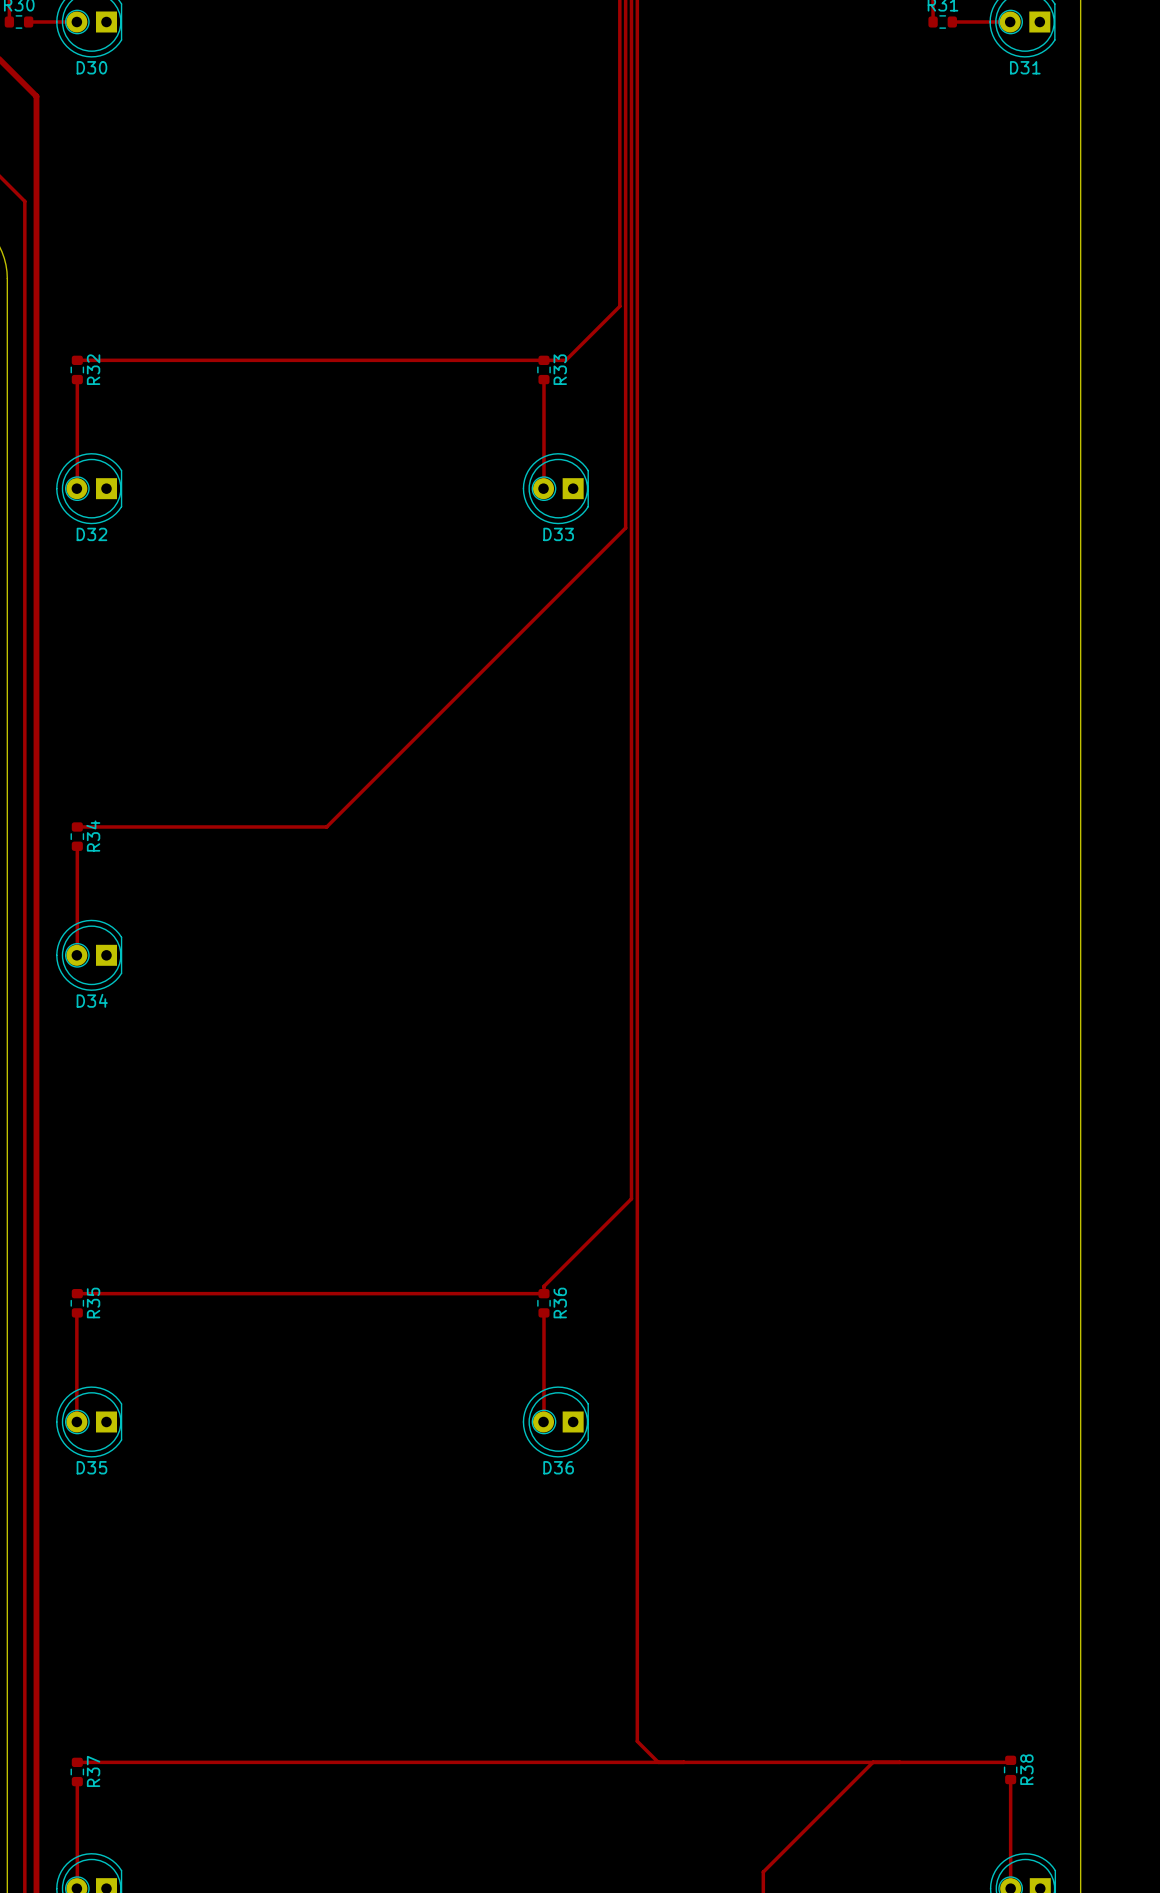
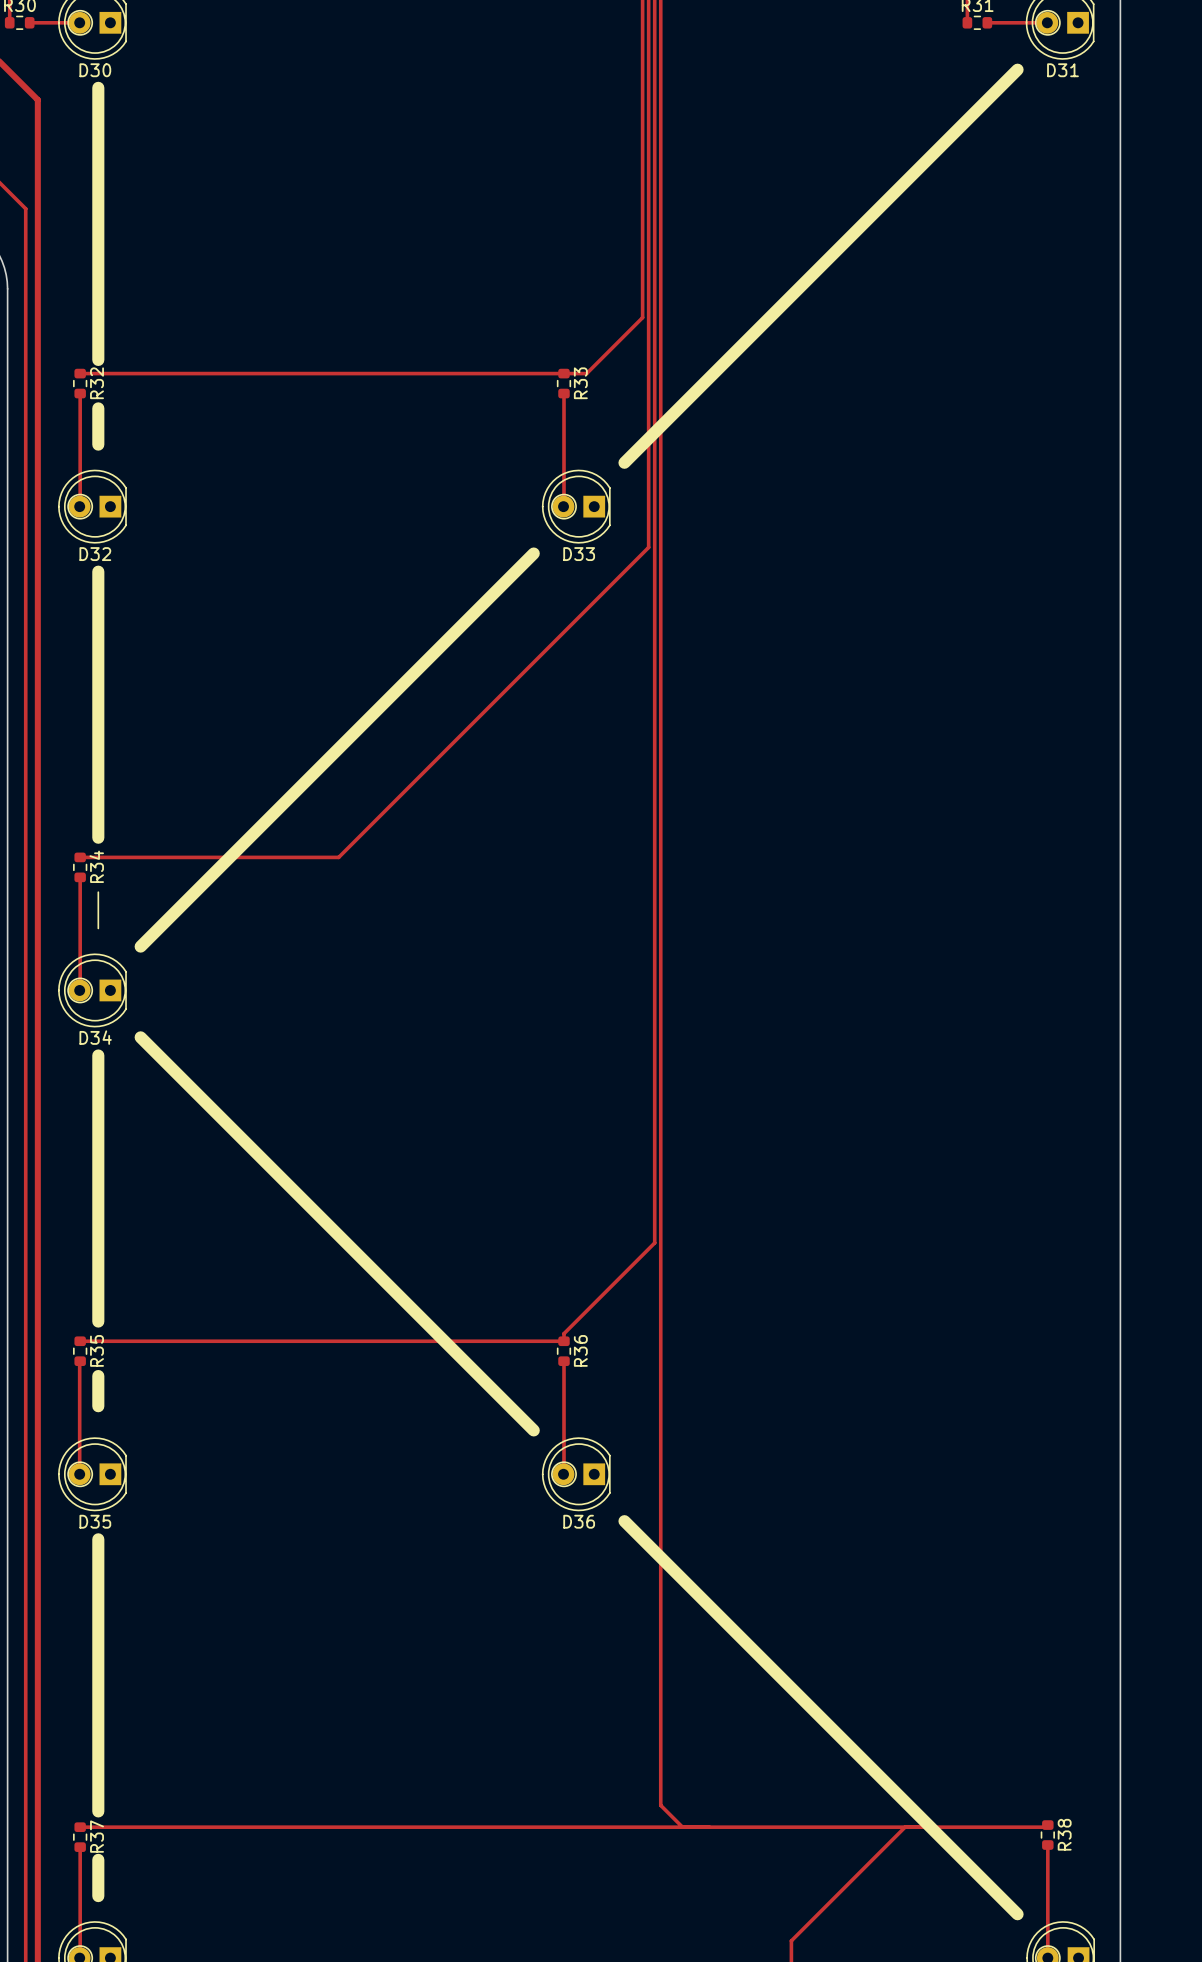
line: none -> (1017, 69) (624, 462)
line: none -> (98, 87) (98, 359)
line: none -> (98, 408) (98, 444)
line: none -> (533, 553) (140, 946)
line: none -> (98, 571) (98, 837)
line: none -> (98, 892) (98, 928)
line: none -> (140, 1037) (533, 1430)
line: none -> (98, 1055) (98, 1321)
line: none -> (98, 1376) (98, 1406)
line: none -> (624, 1521) (1017, 1914)
line: none -> (98, 1539) (98, 1811)
line: none -> (98, 1859) (98, 1896)

